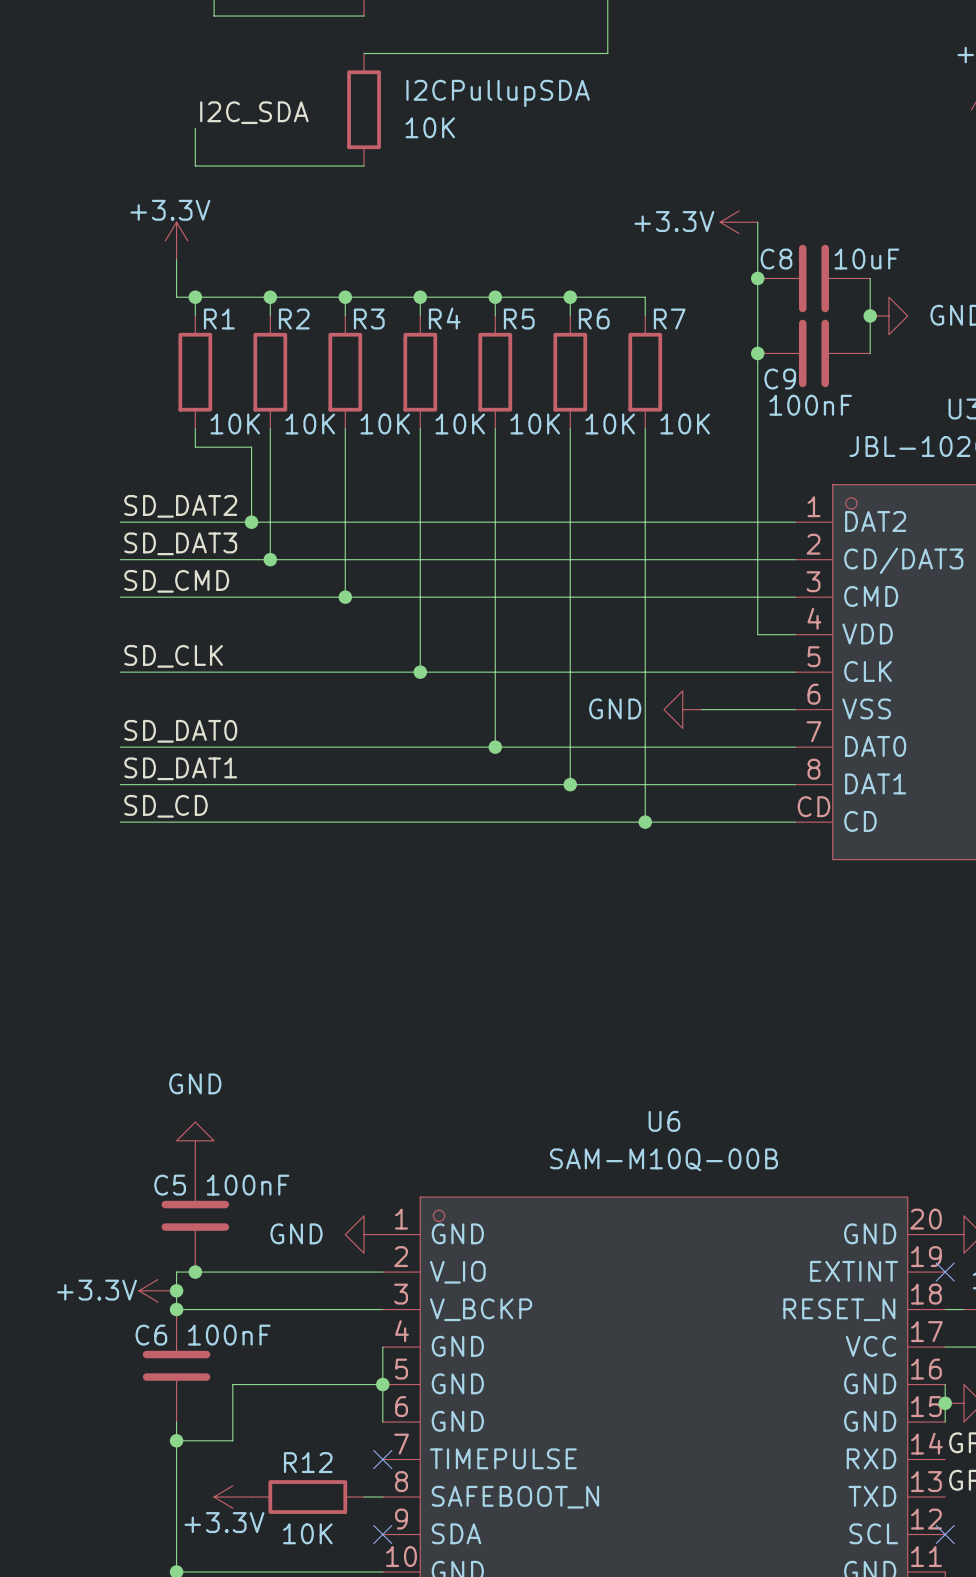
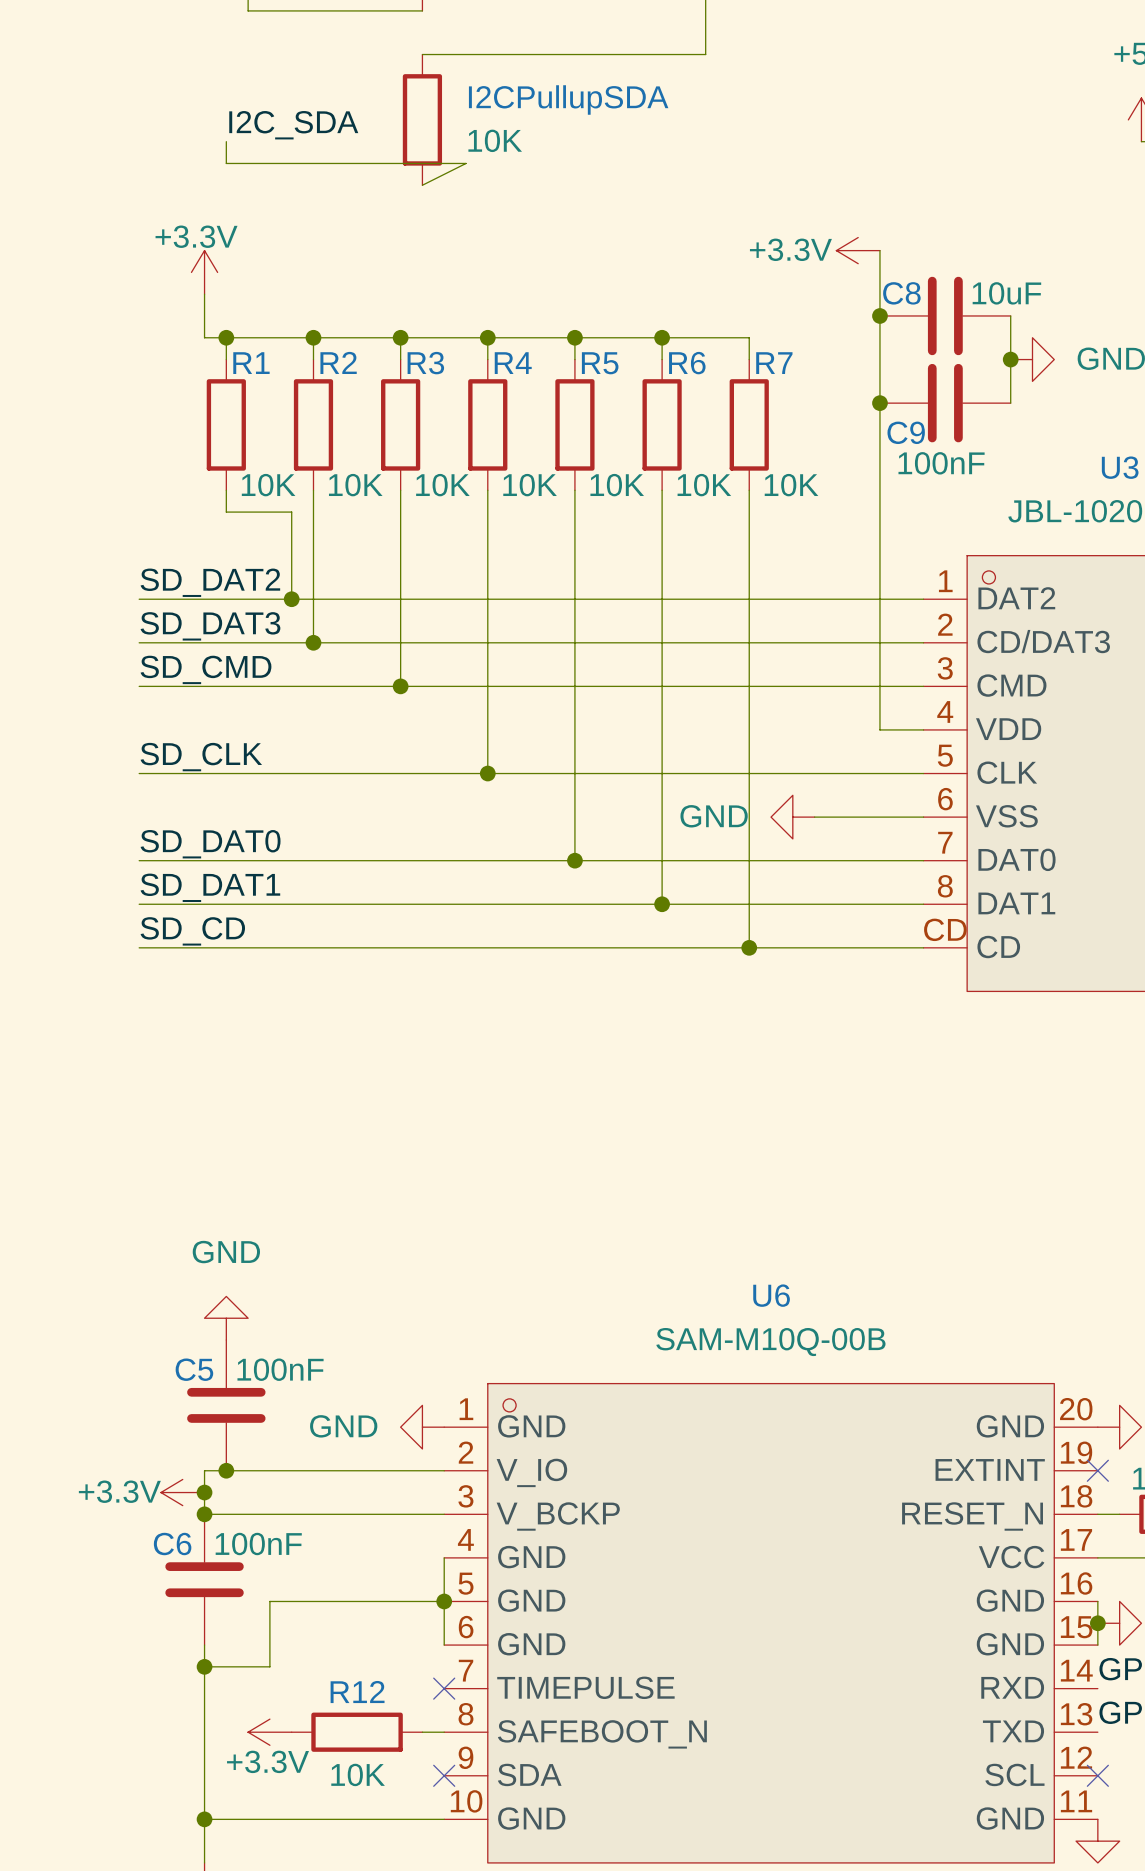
wire: (195, 147) (195, 165) (364, 165) -> (226, 163) (466, 163) (422, 185)

